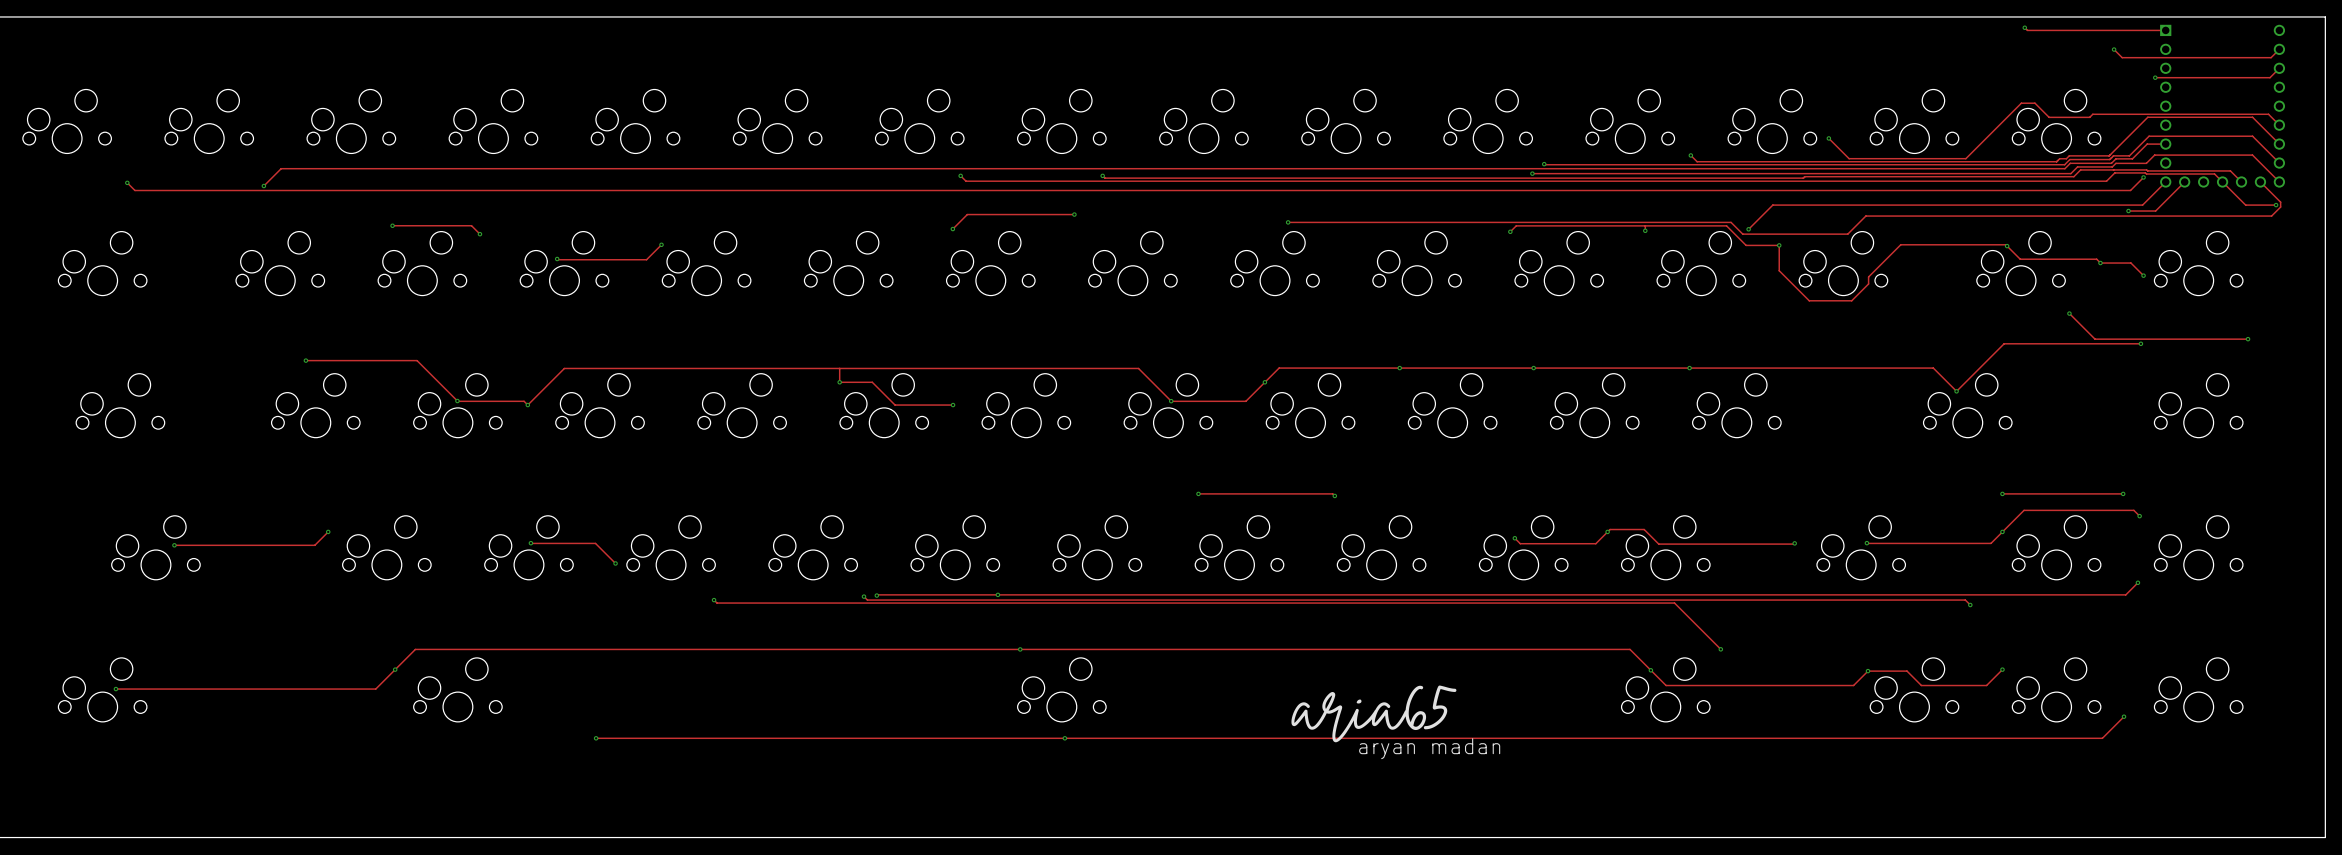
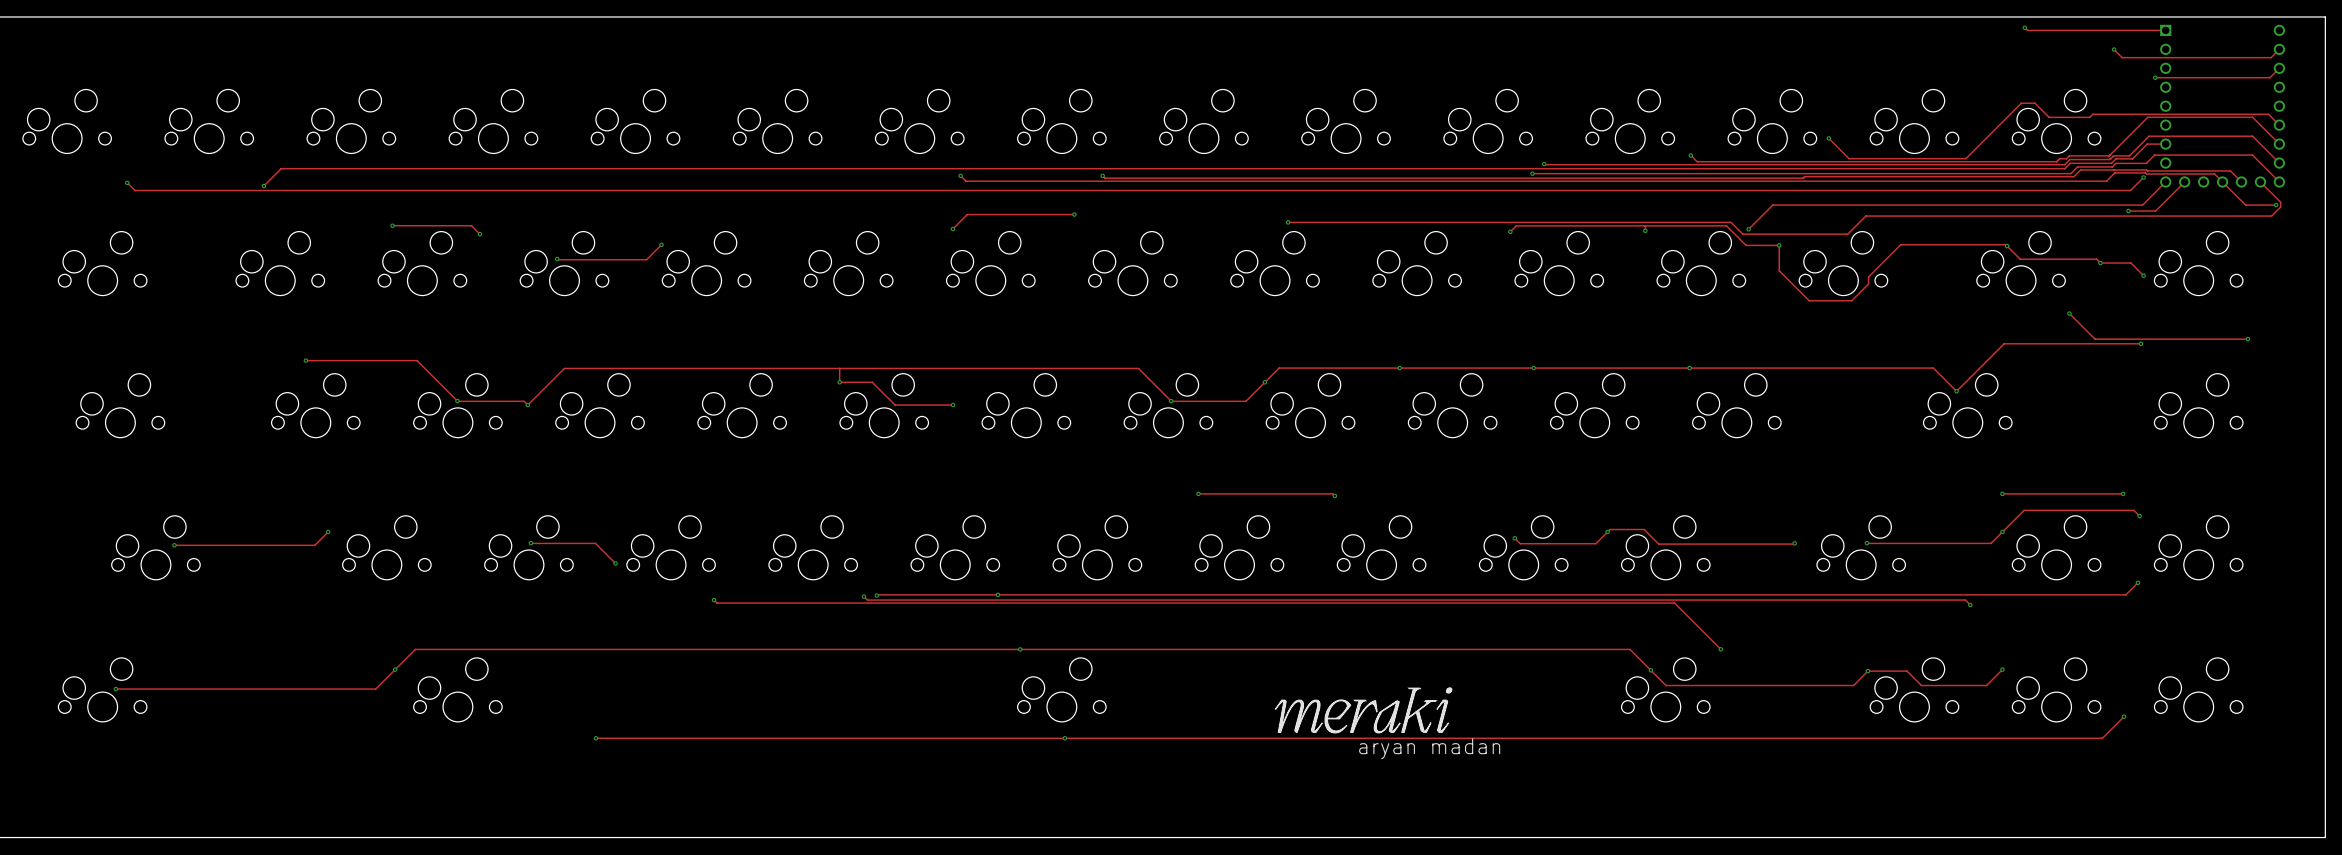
drawing: [1291, 685, 1457, 743] -> none
drawing: none -> [1274, 687, 1453, 734]

